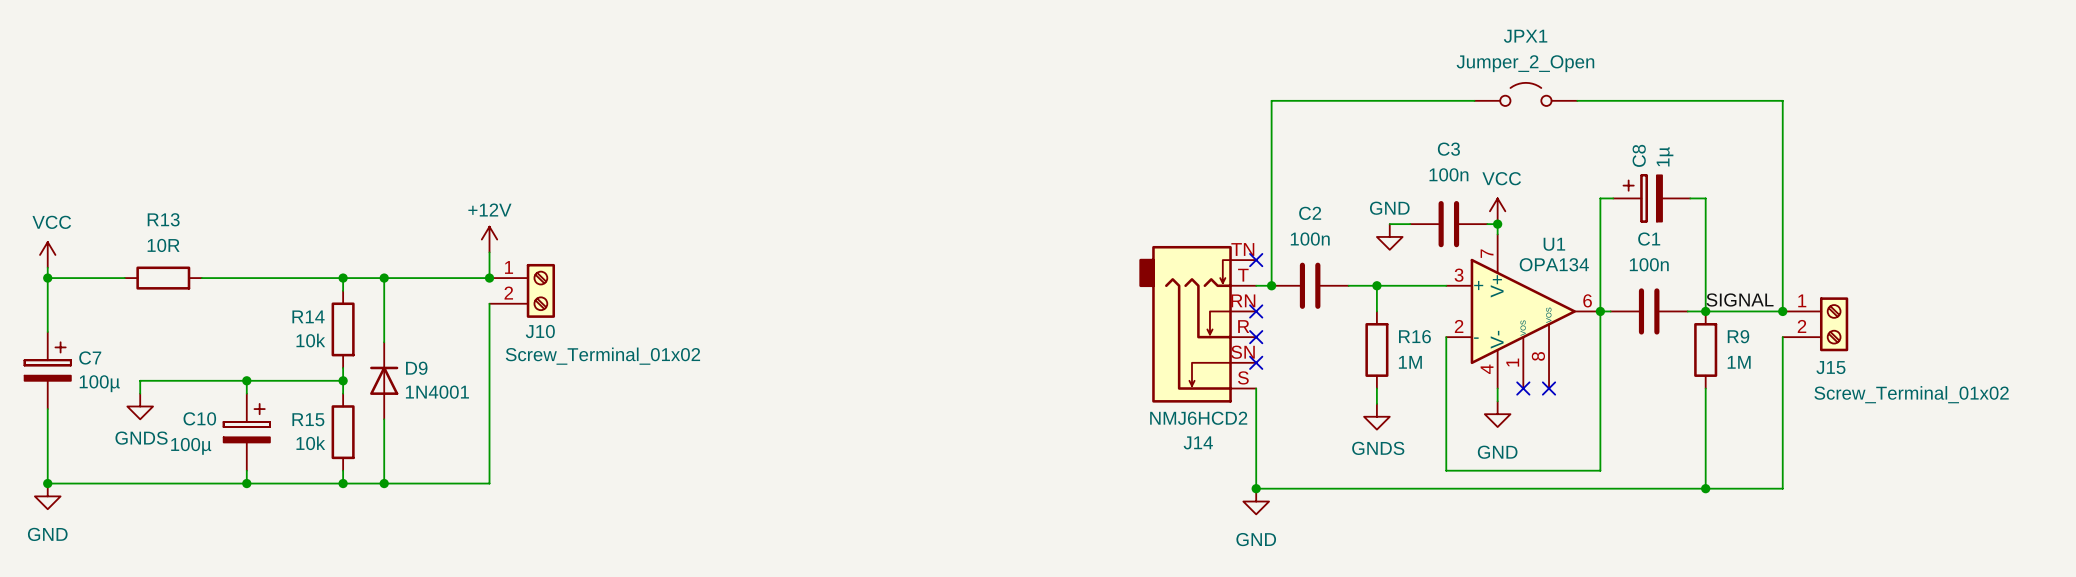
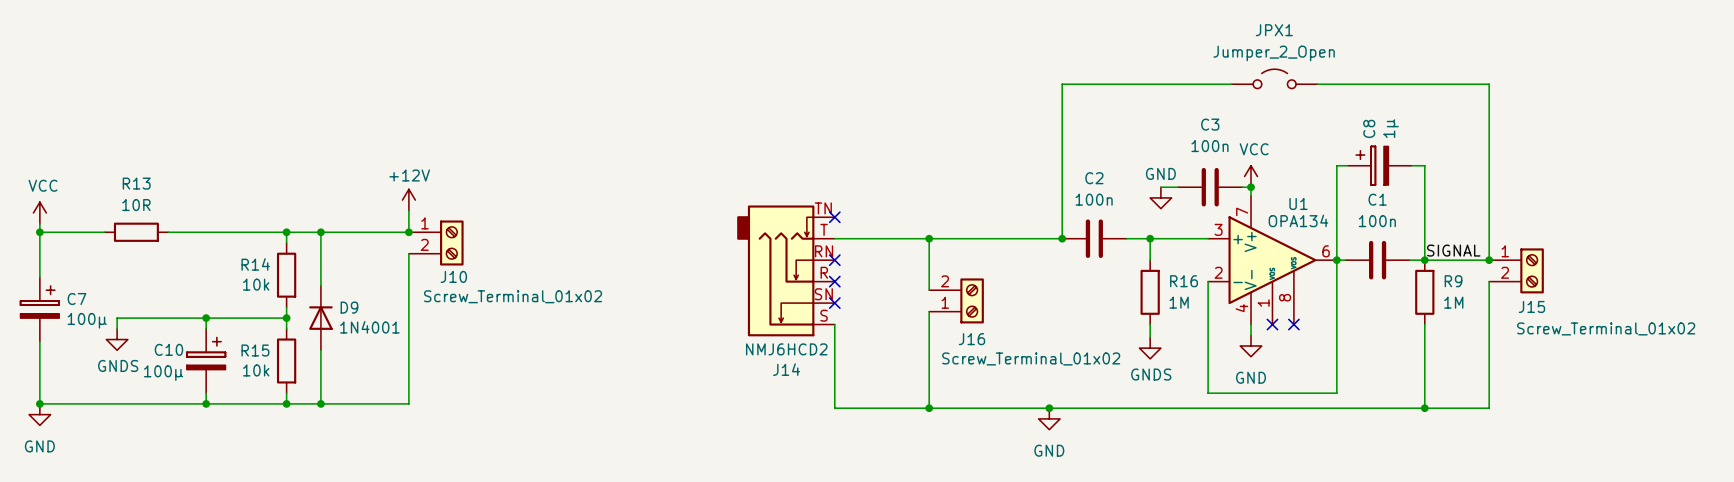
no-connect mark: none -> (834, 217)
no-connect mark: (1256, 260) -> none
wire: none -> (834, 238) (1049, 238)
wire: none -> (929, 238) (929, 290)
junction: none -> (929, 238)
no-connect mark: none -> (834, 260)
no-connect mark: (1256, 311) -> none
J14 position: (1197, 324) -> (785, 270)
no-connect mark: none -> (834, 281)
no-connect mark: (1256, 337) -> none
J16: none -> Screw_Terminal_01x02 (956, 300)
no-connect mark: none -> (834, 303)
no-connect mark: (1256, 362) -> none
wire: none -> (929, 311) (929, 408)
wire: (1256, 388) (1256, 488) -> (834, 324) (834, 408) (1049, 408)
junction: none -> (929, 408)

